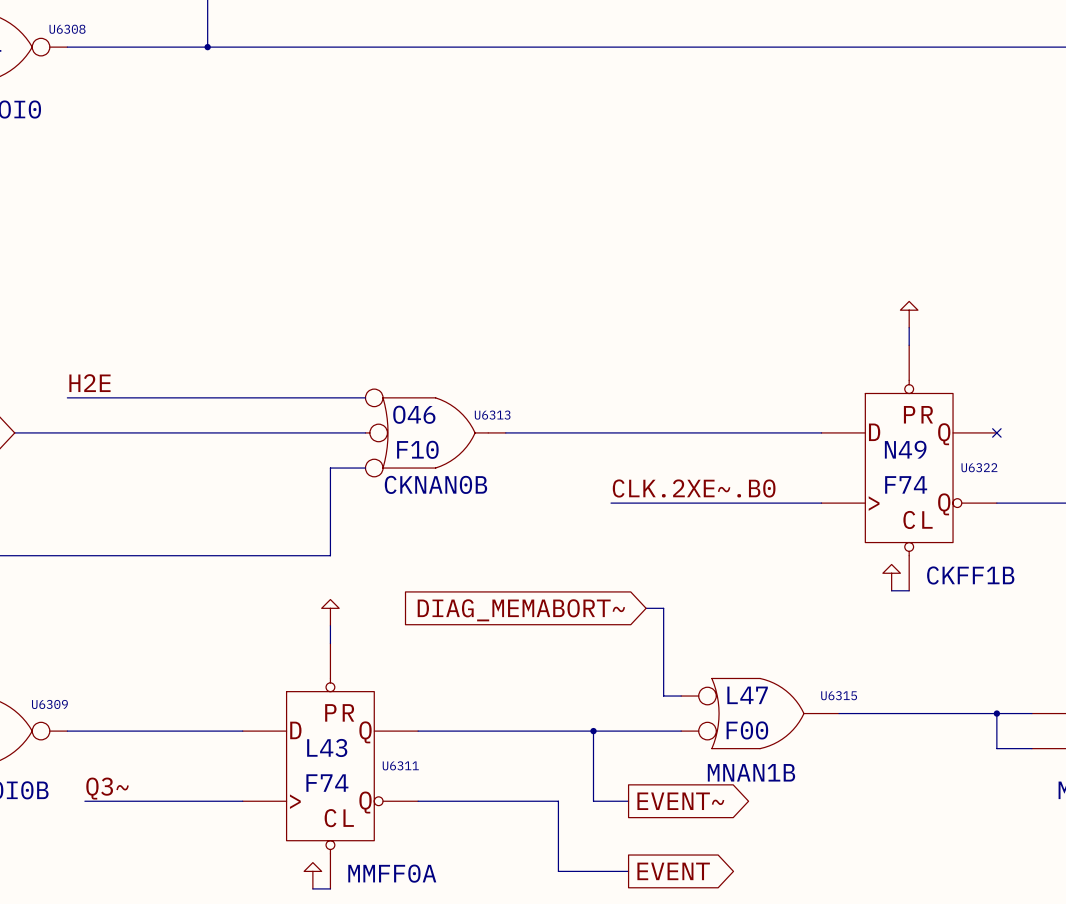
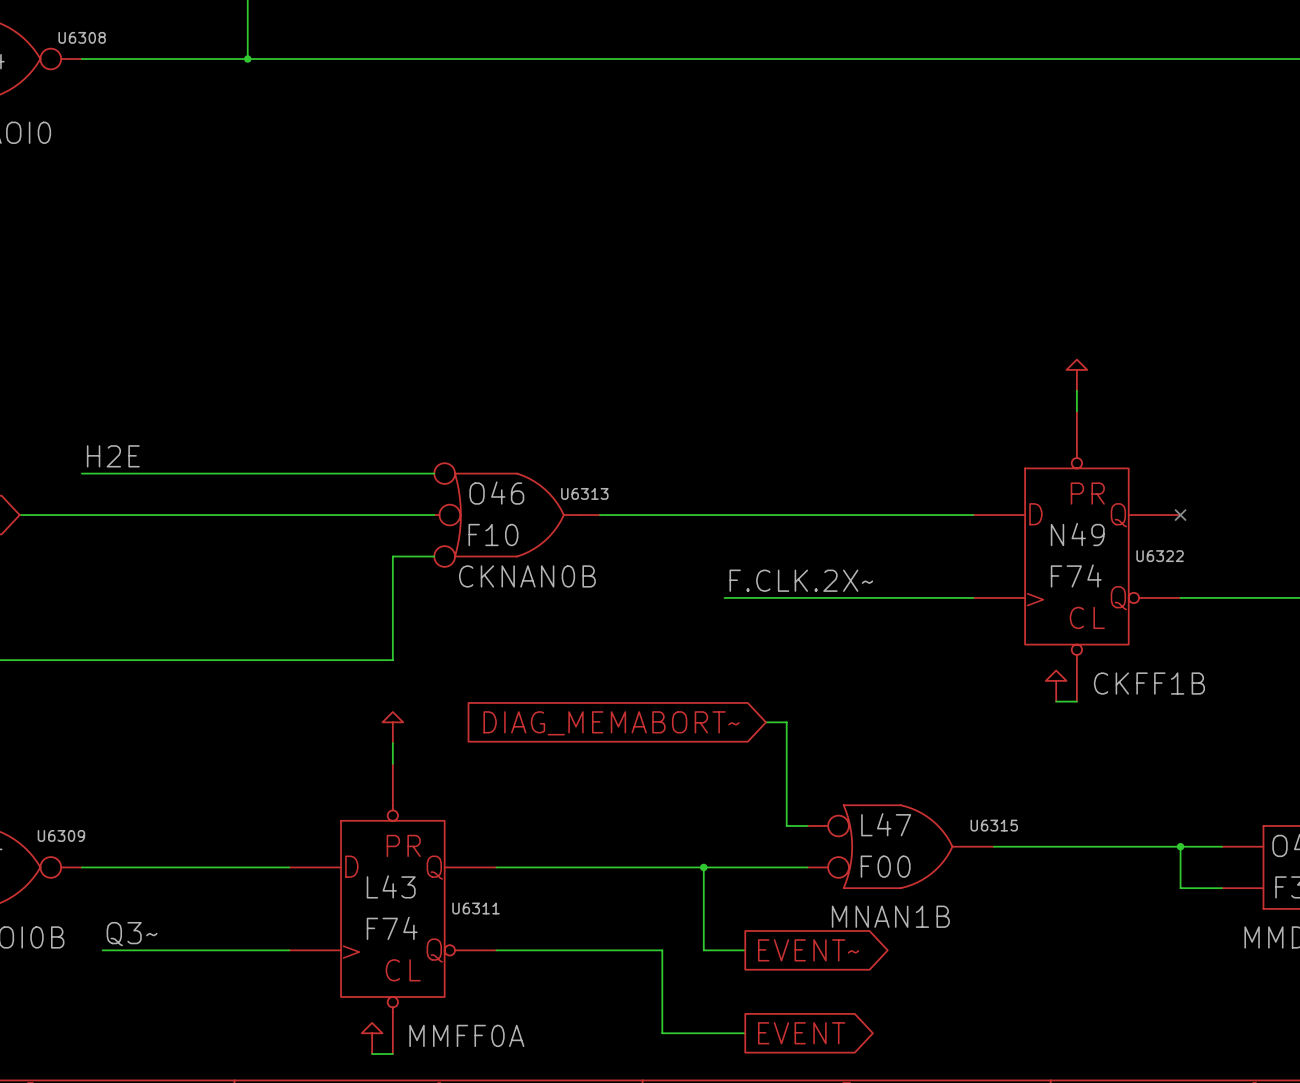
label: CLK.2XE~.B0 (694, 488) -> F.CLK.2X~ (801, 580)

